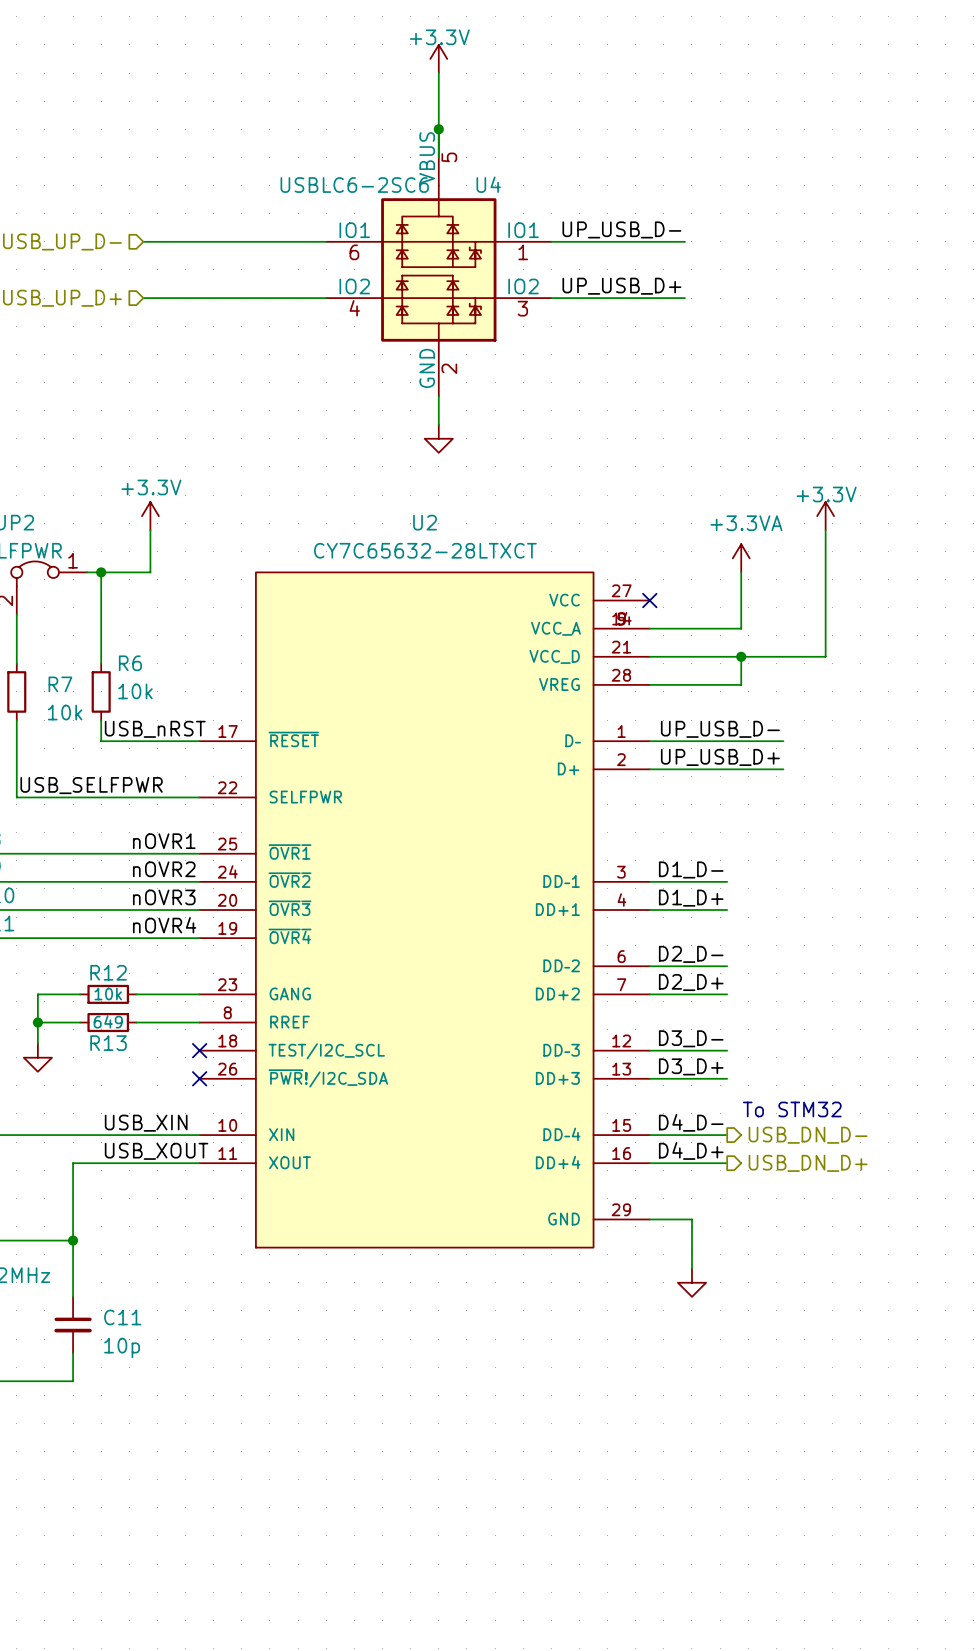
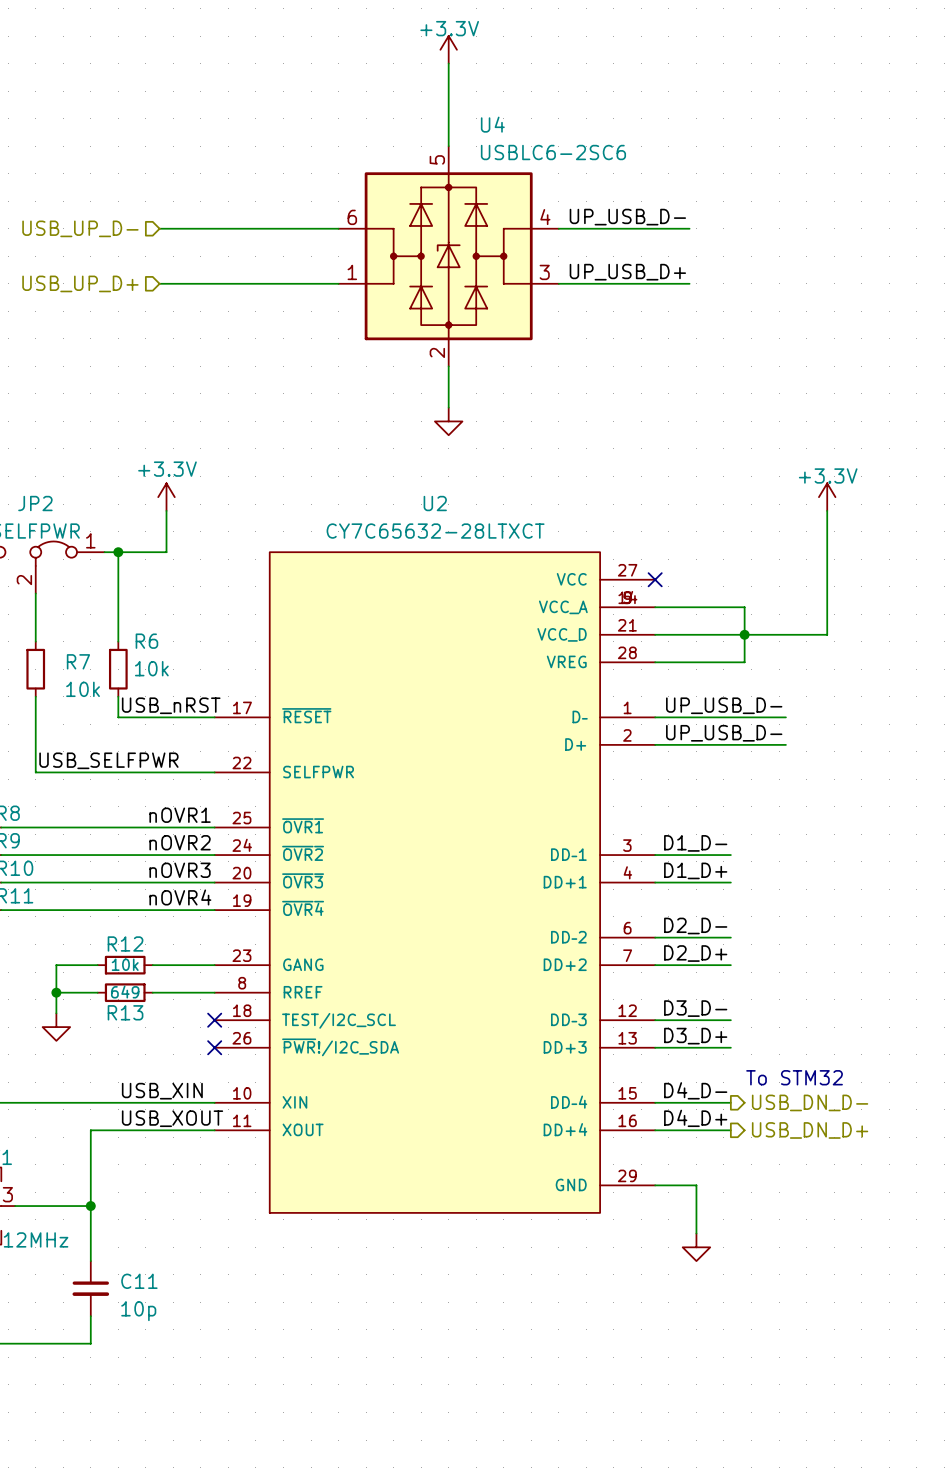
U4 symbol: [326, 129, 552, 397] -> [338, 146, 559, 367]
junction: (438, 129) -> none
U4 name position: U4 (488, 184) -> U4 (492, 124)
U4 value position: USBLC6-2SC6 (354, 185) -> USBLC6-2SC6 (553, 152)
power symbol: +3.3VA (741, 558) -> none
wire: (741, 572) (741, 628) -> (744, 634) (744, 607)
label: UP_USB_D+ (720, 757) -> UP_USB_D- (724, 733)

